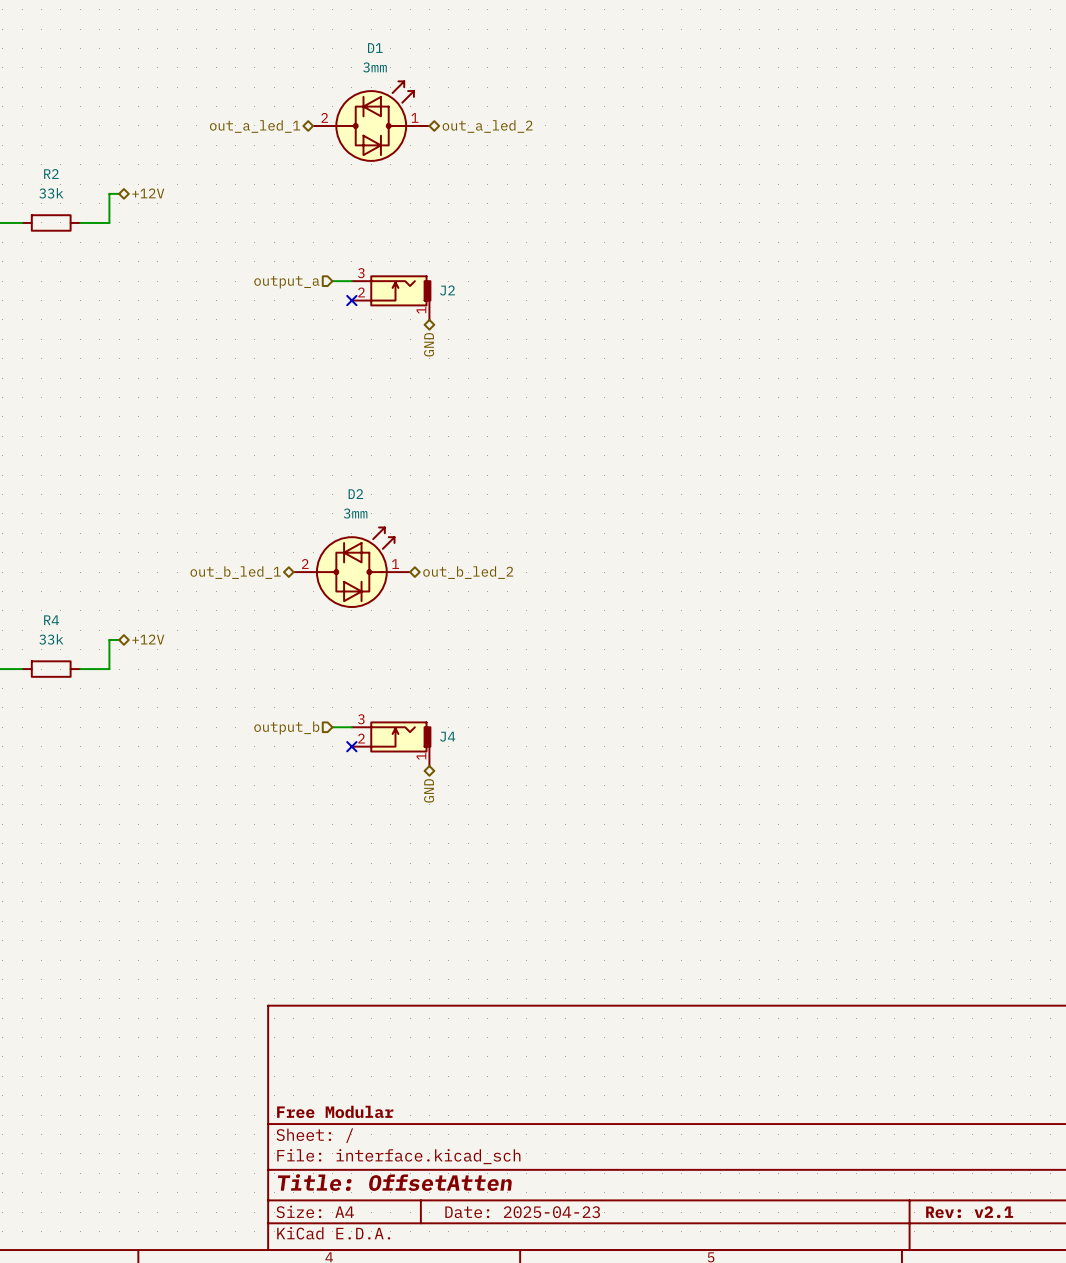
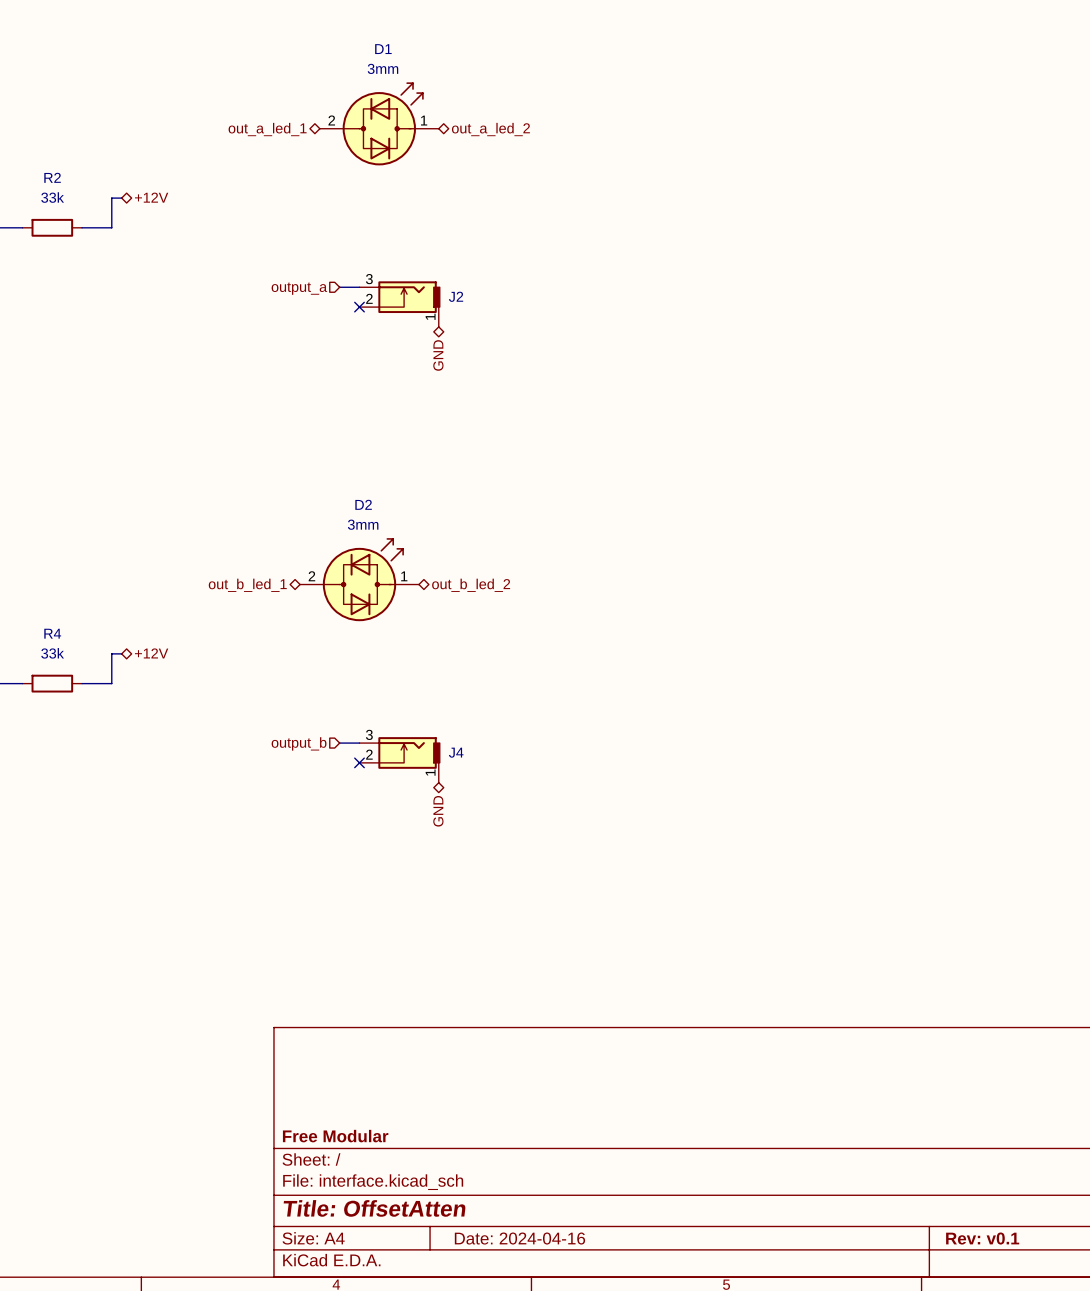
title block: Date: 2025-04-23 (522, 1212) -> Date: 2024-04-16 (519, 1238)
title block: Rev: v2.1 (969, 1212) -> Rev: v0.1 (982, 1238)

